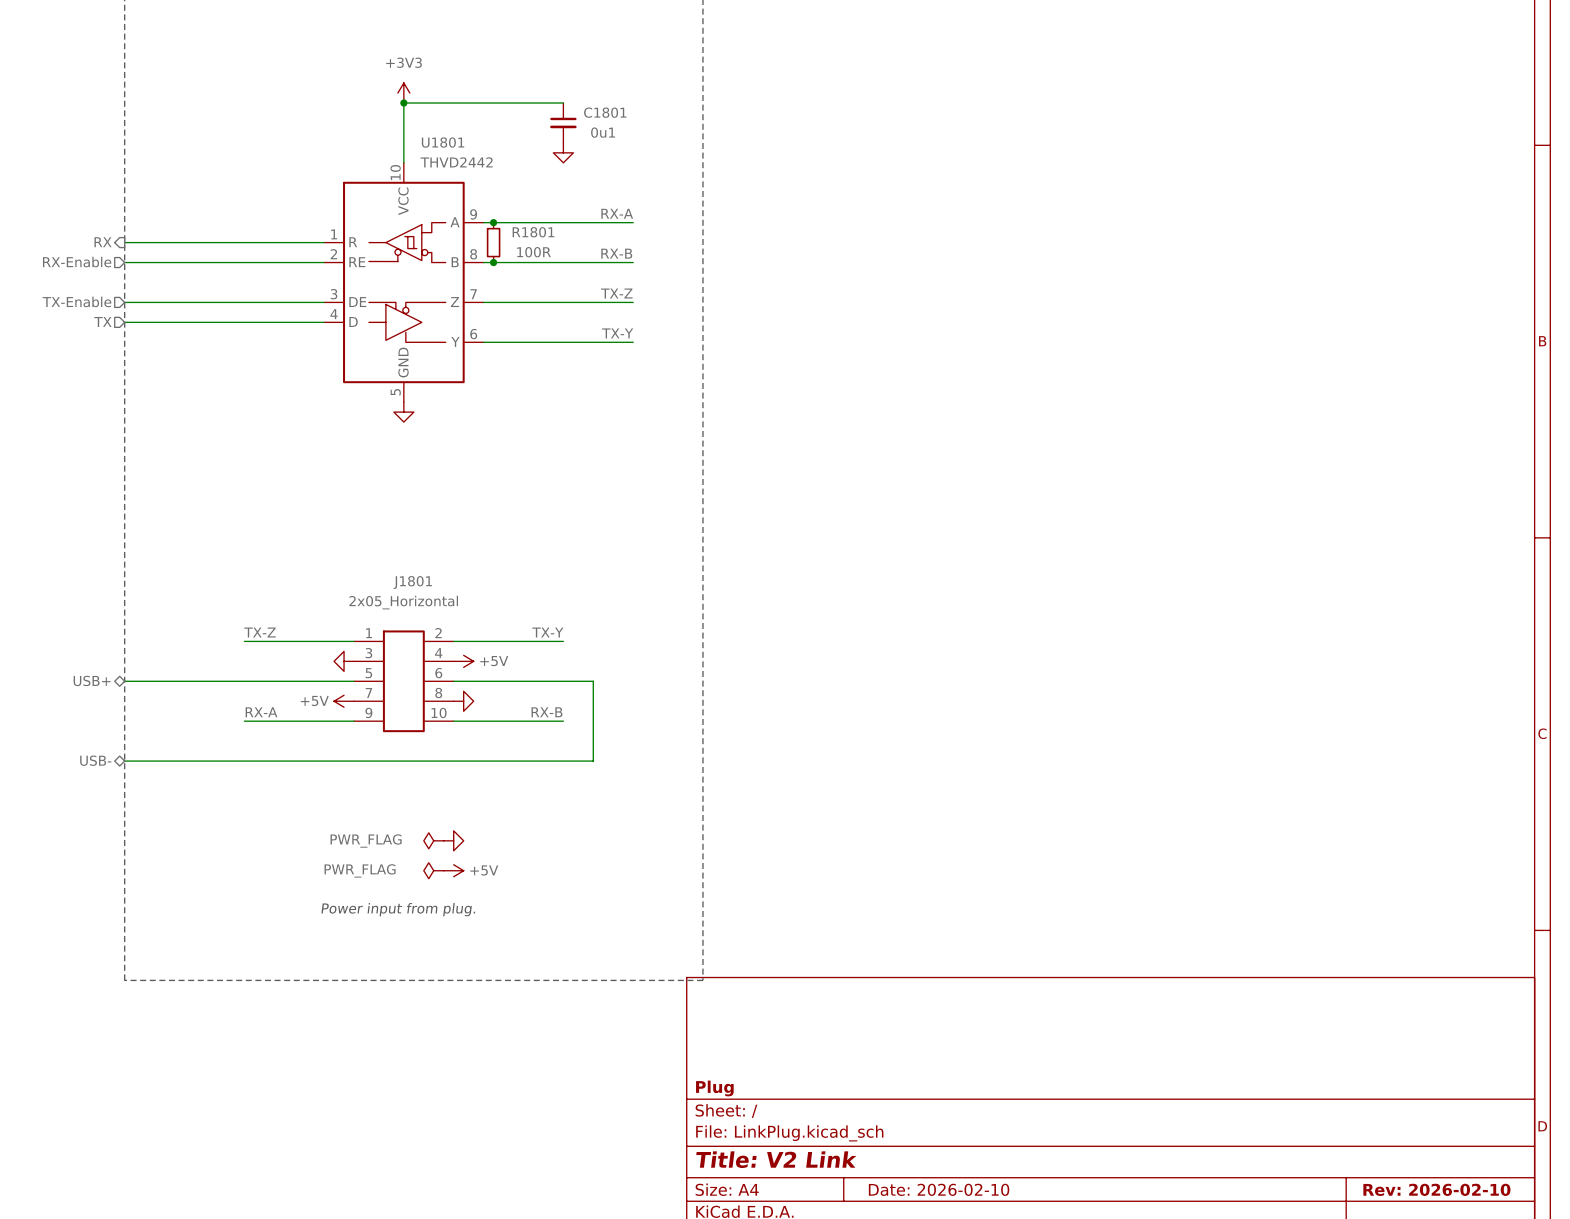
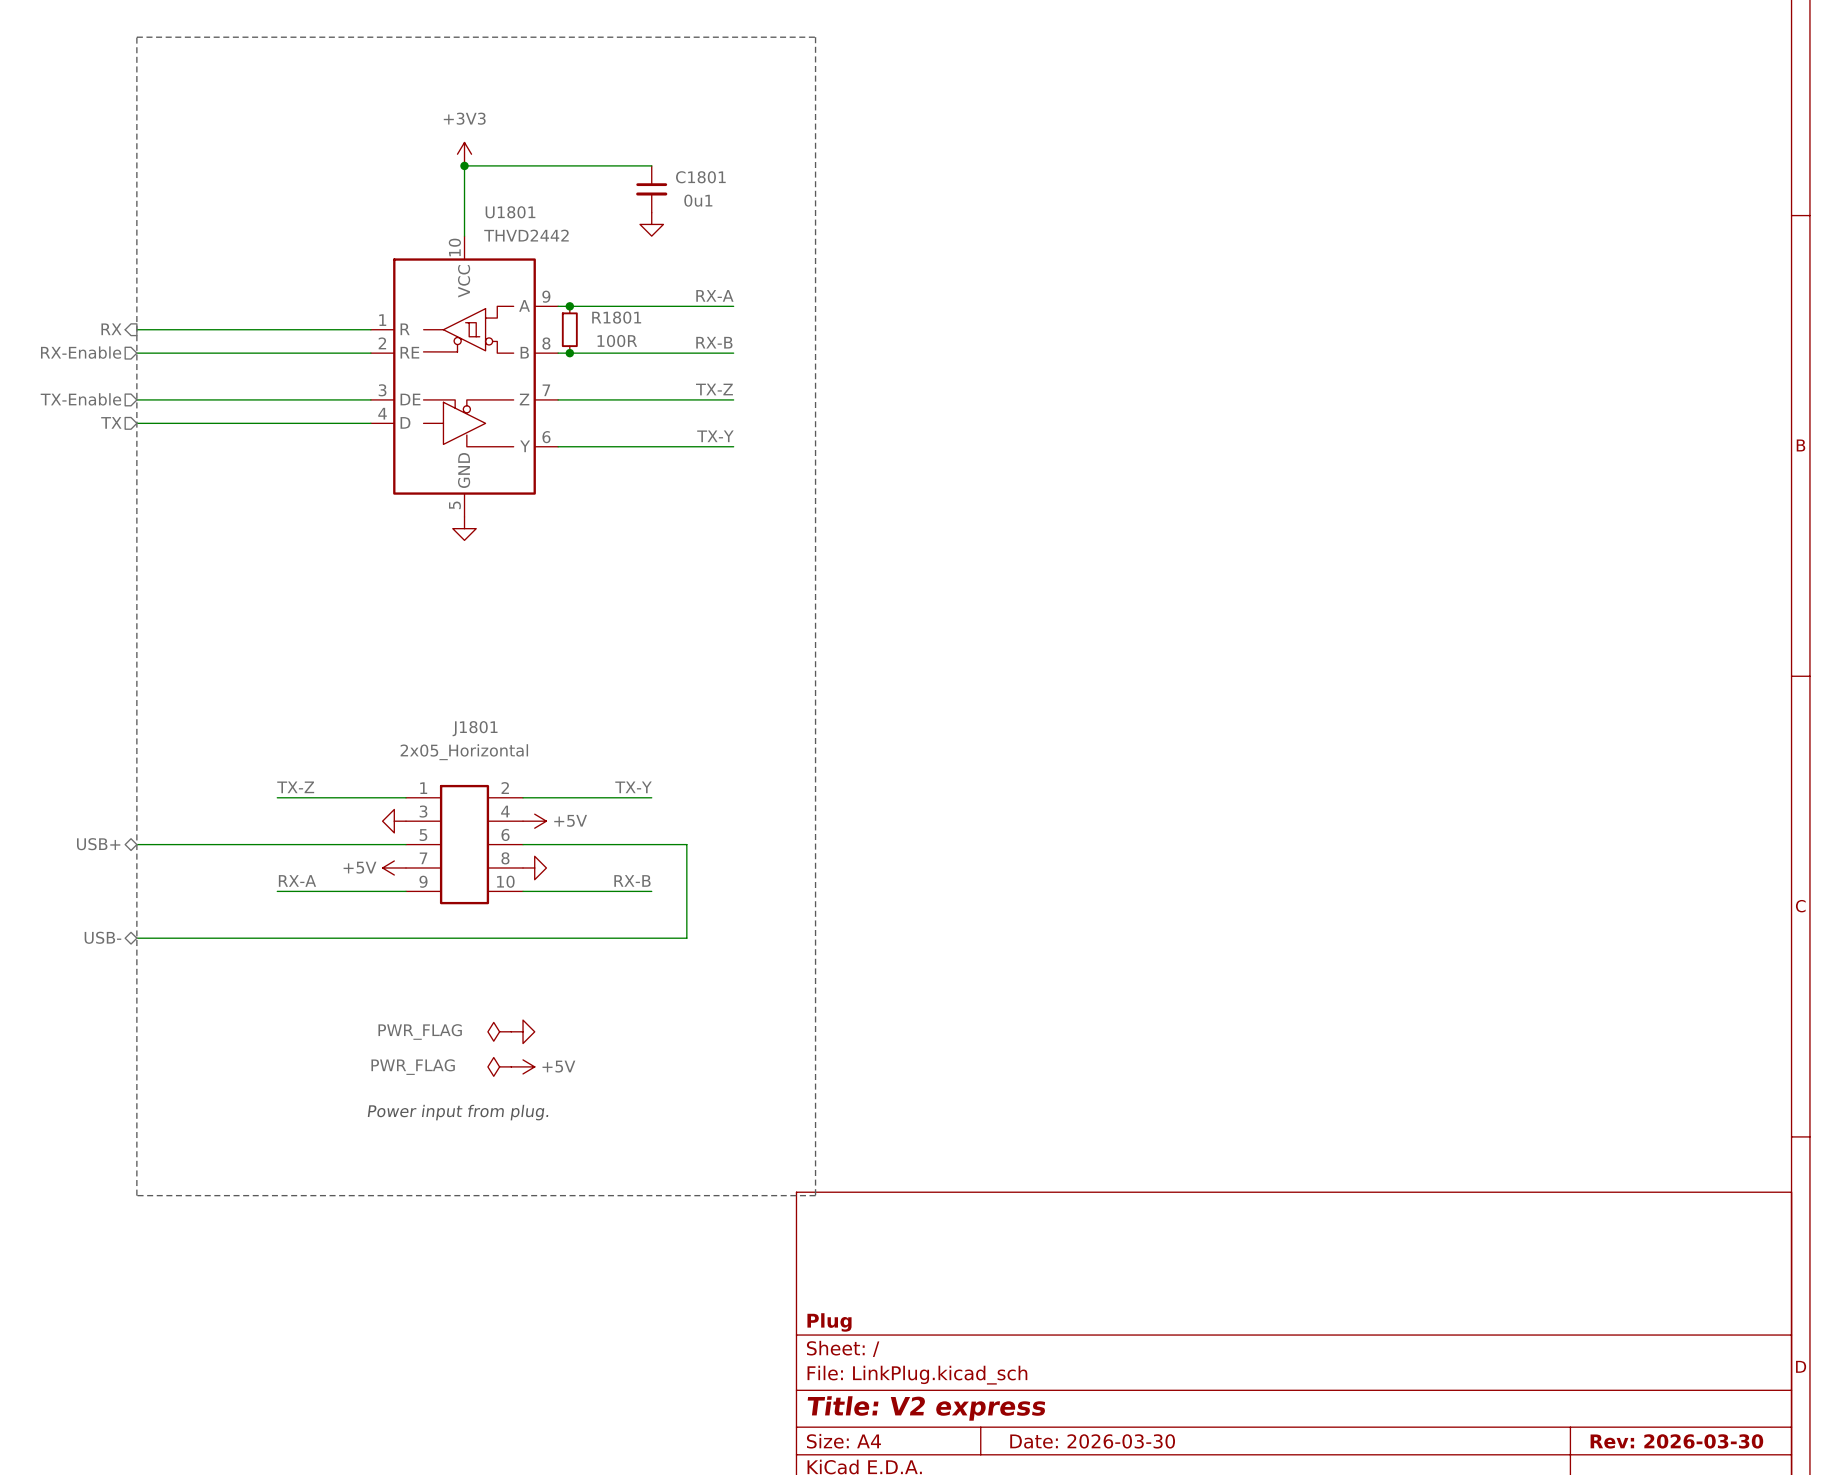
title block: Title: V2 Link (776, 1159) -> Title: V2 express (926, 1408)
title block: Date: 2026-02-10 (939, 1189) -> Date: 2026-03-30 (1092, 1441)
title block: Rev: 2026-02-10 (1436, 1189) -> Rev: 2026-03-30 (1676, 1441)

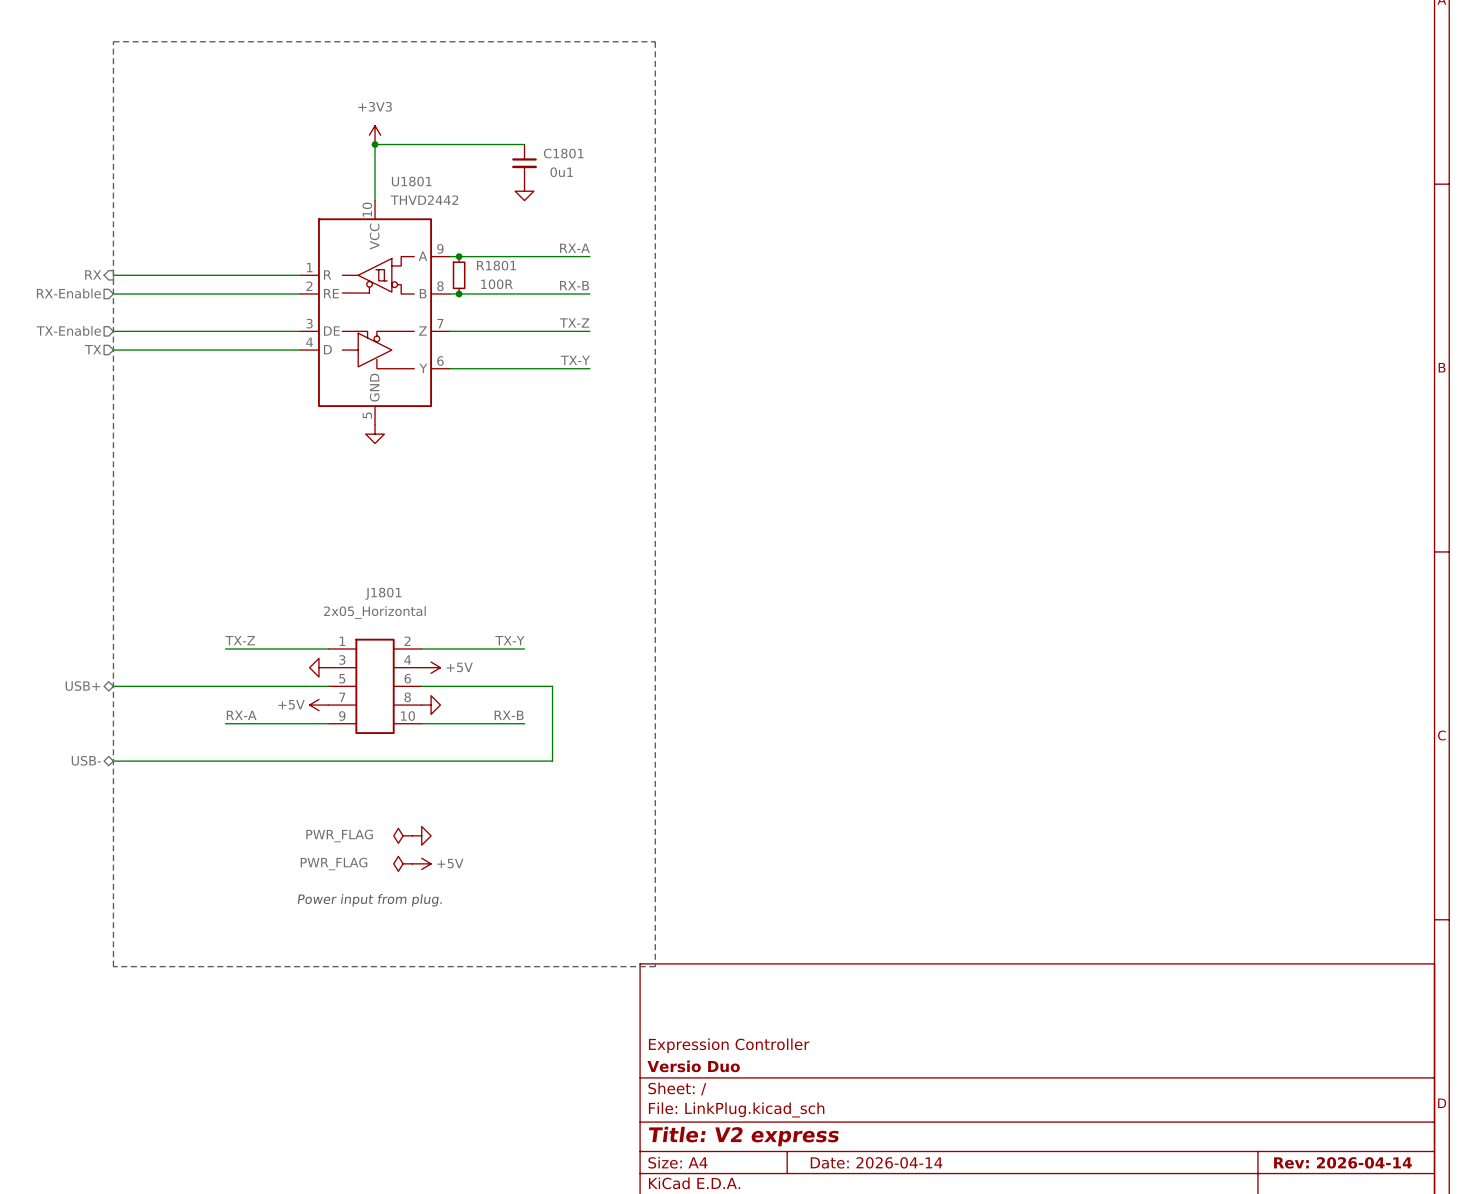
title block: none -> Expression Controller (729, 1045)
title block: Plug (829, 1322) -> Versio Duo (693, 1066)
title block: Date: 2026-03-30 (1092, 1441) -> Date: 2026-04-14 (876, 1162)
title block: Rev: 2026-03-30 (1676, 1441) -> Rev: 2026-04-14 (1342, 1162)

